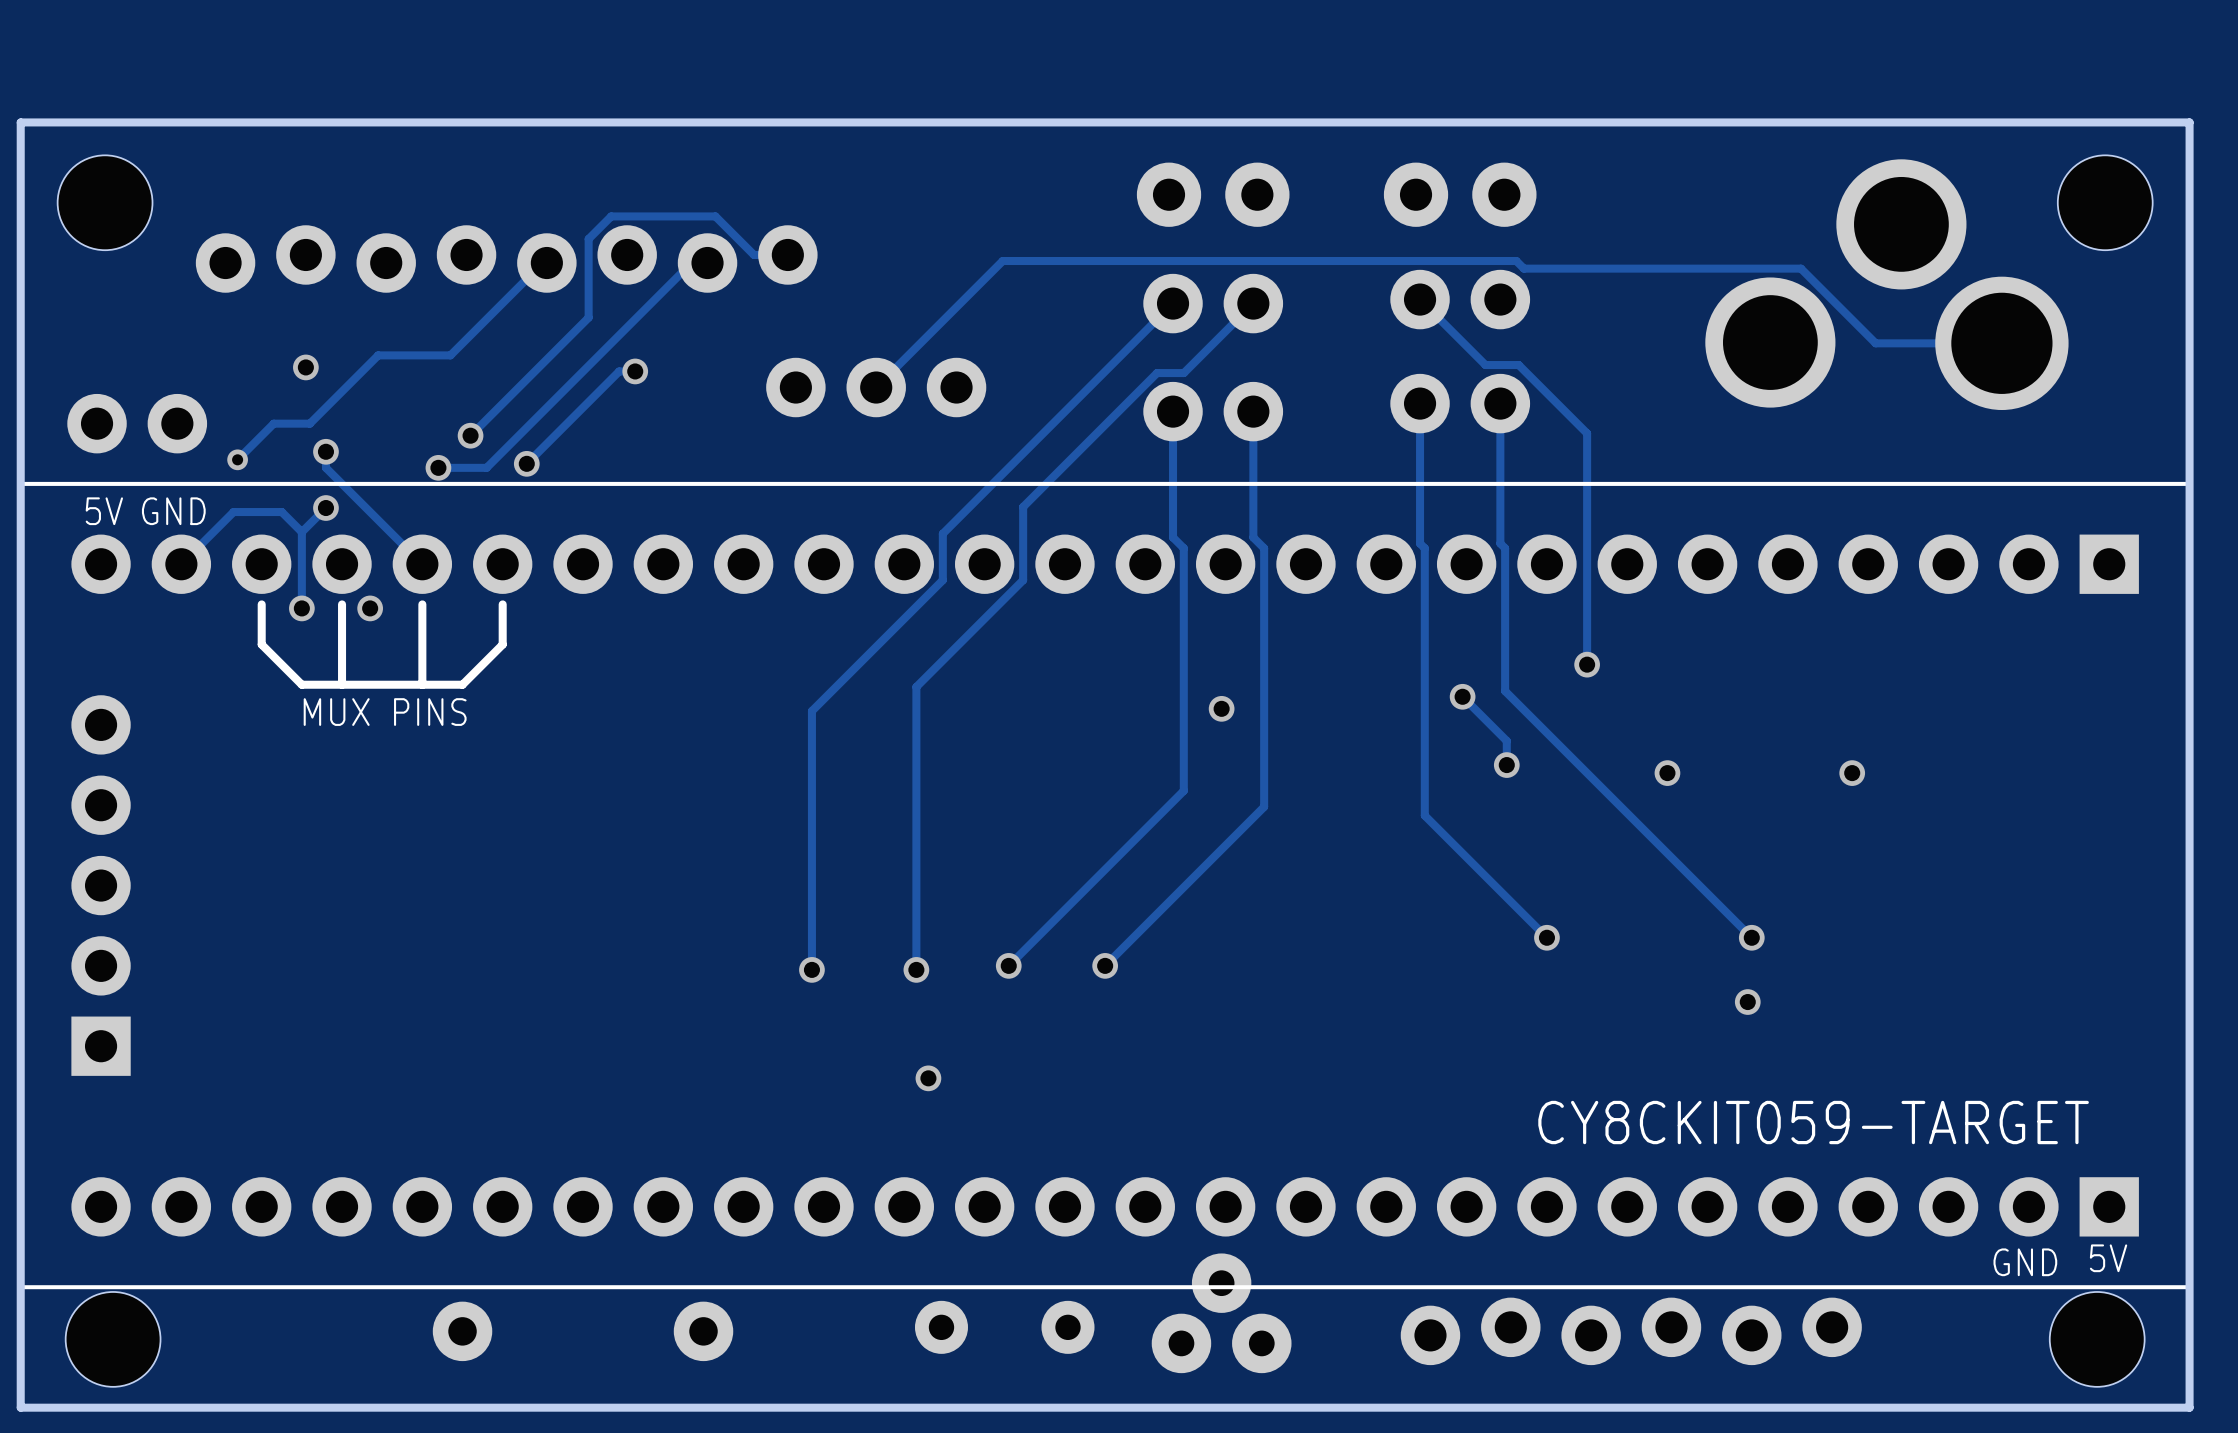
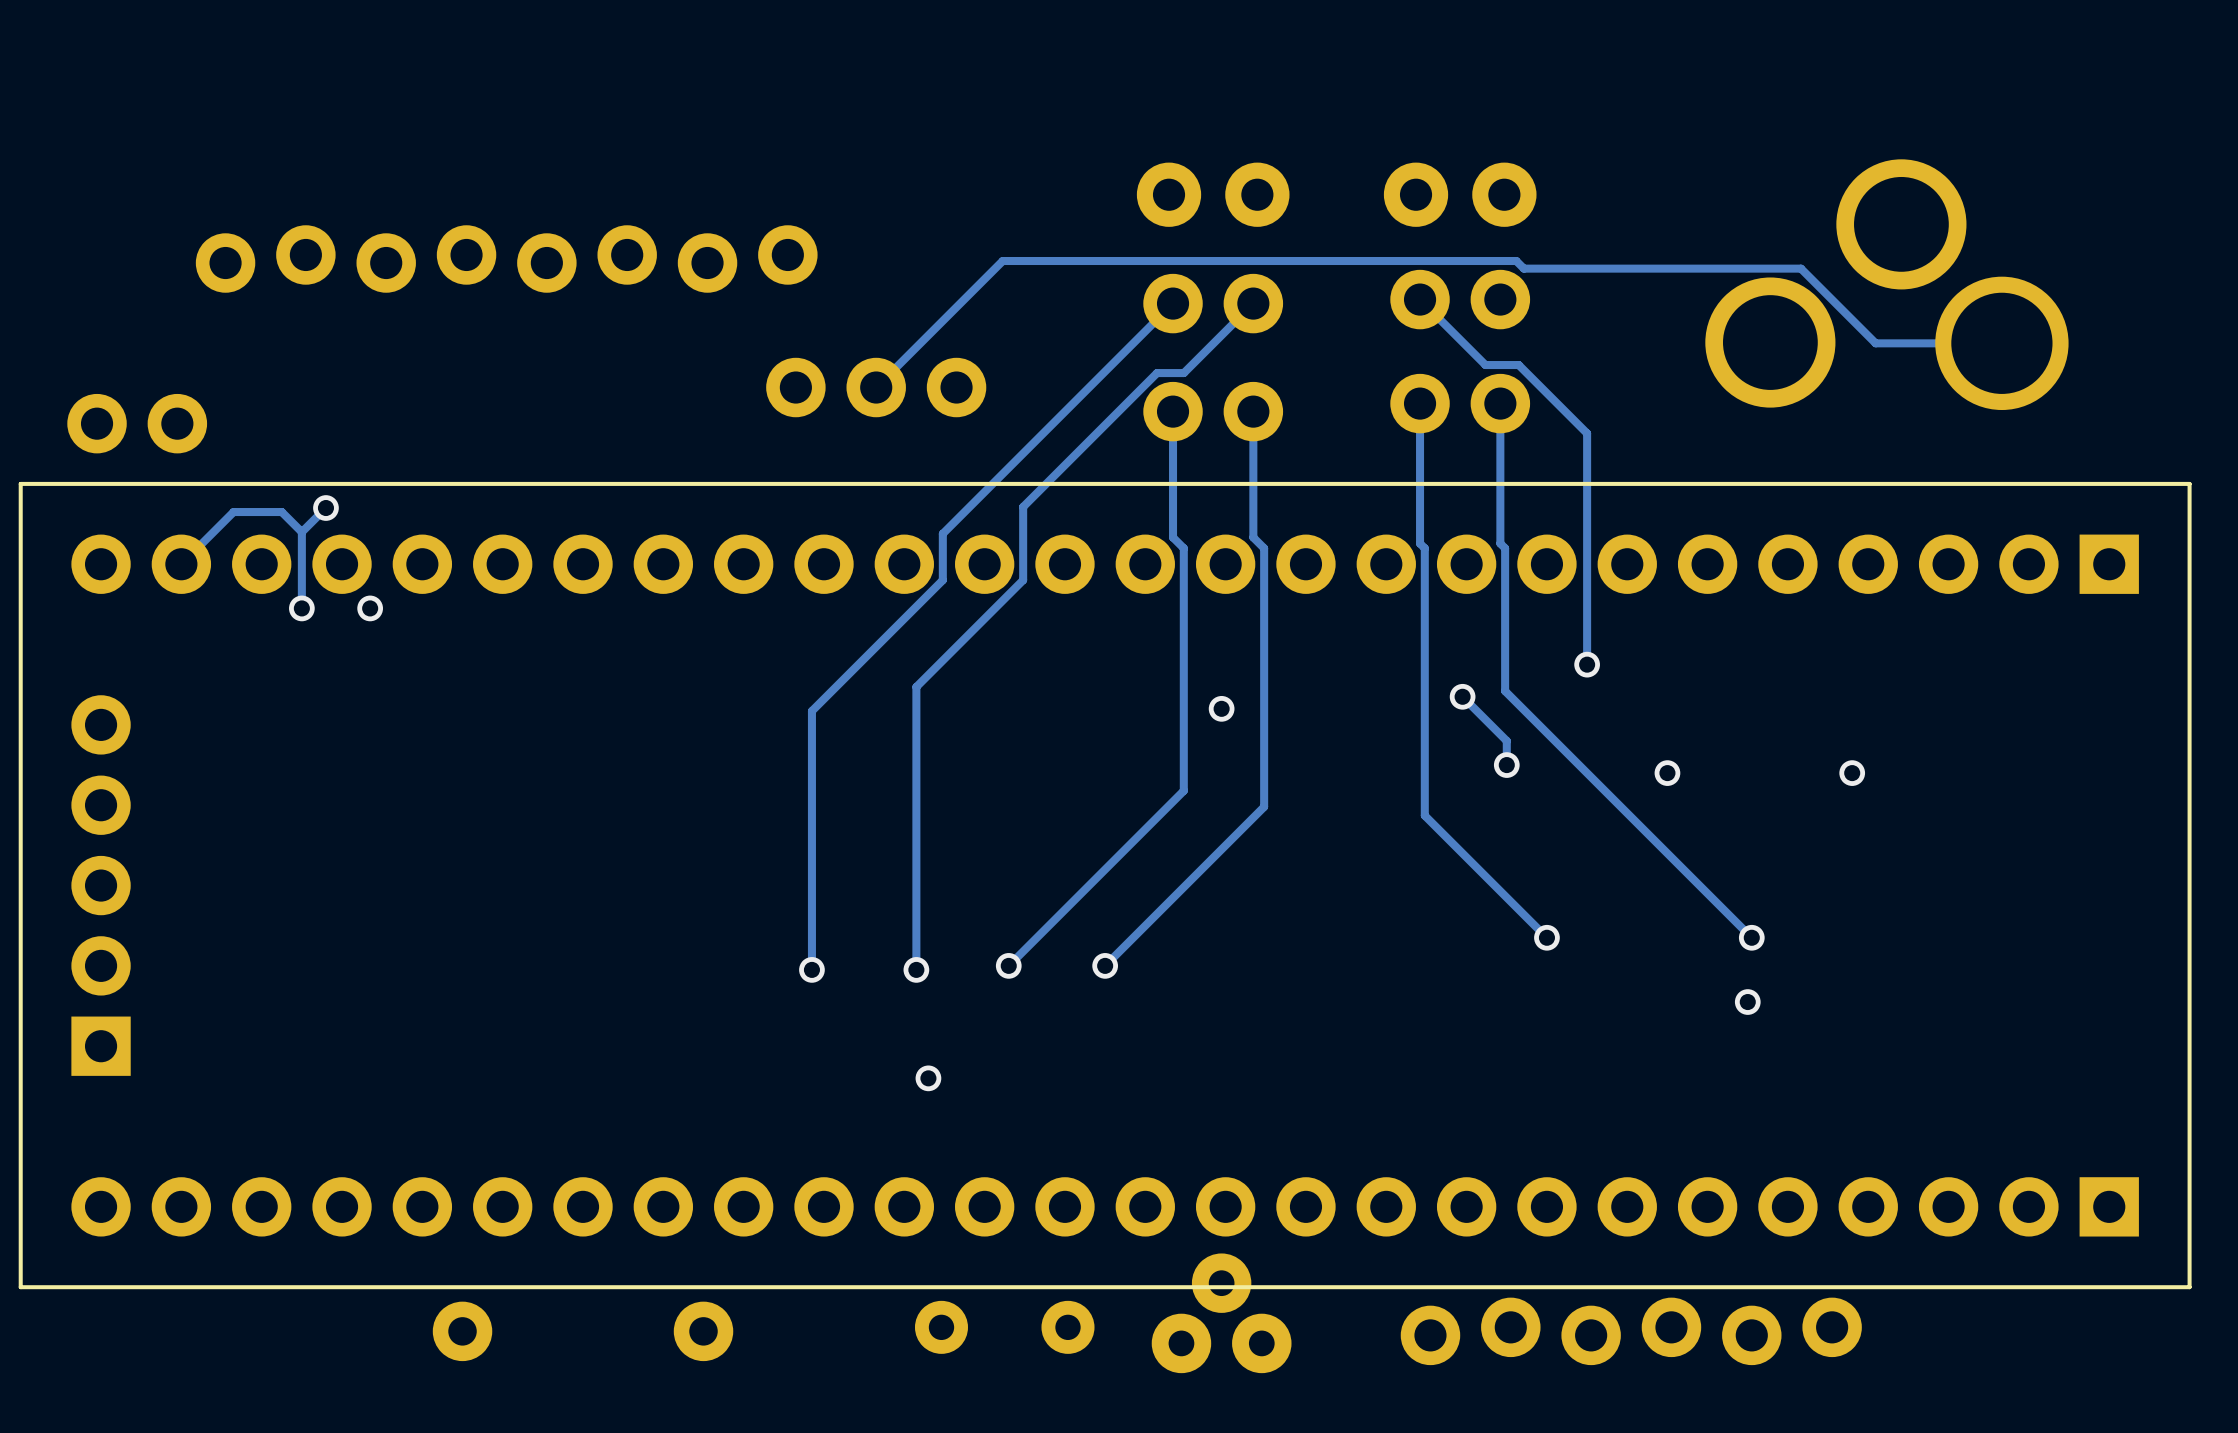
board edge: (2189, 122) (2189, 1407) (20, 1407) (20, 122) (2189, 122) -> none
hole: (105, 202) -> none
hole: (2105, 202) -> none
track: (787, 254) (754, 254) (715, 216) (611, 216) (588, 239) (588, 317) (470, 435) -> none
track: (542, 263) (450, 355) (378, 355) (309, 423) (273, 423) (237, 459) -> none
track: (707, 263) (691, 263) (486, 467) (438, 467) -> none
via: (305, 367) -> none
track: (635, 371) (619, 371) (526, 463) -> none
via: (635, 371) -> none
via: (470, 435) -> none
track: (325, 451) (325, 467) (422, 564) -> none
via: (325, 451) -> none
via: (237, 459) -> none
via: (526, 463) -> none
via: (438, 467) -> none
text: 5V (104, 511) -> none
text: GND (173, 511) -> none
line: (342, 604) (342, 684) -> none
line: (422, 604) (422, 684) -> none
line: (502, 604) (502, 644) (462, 684) (301, 684) (261, 644) (261, 604) -> none
text: MUX PINS (385, 712) -> none
text: CY8CKIT059-TARGET (1813, 1122) -> none
text: 5V (2108, 1258) -> none
text: GND (2025, 1262) -> none
hole: (113, 1339) -> none
hole: (2097, 1339) -> none

